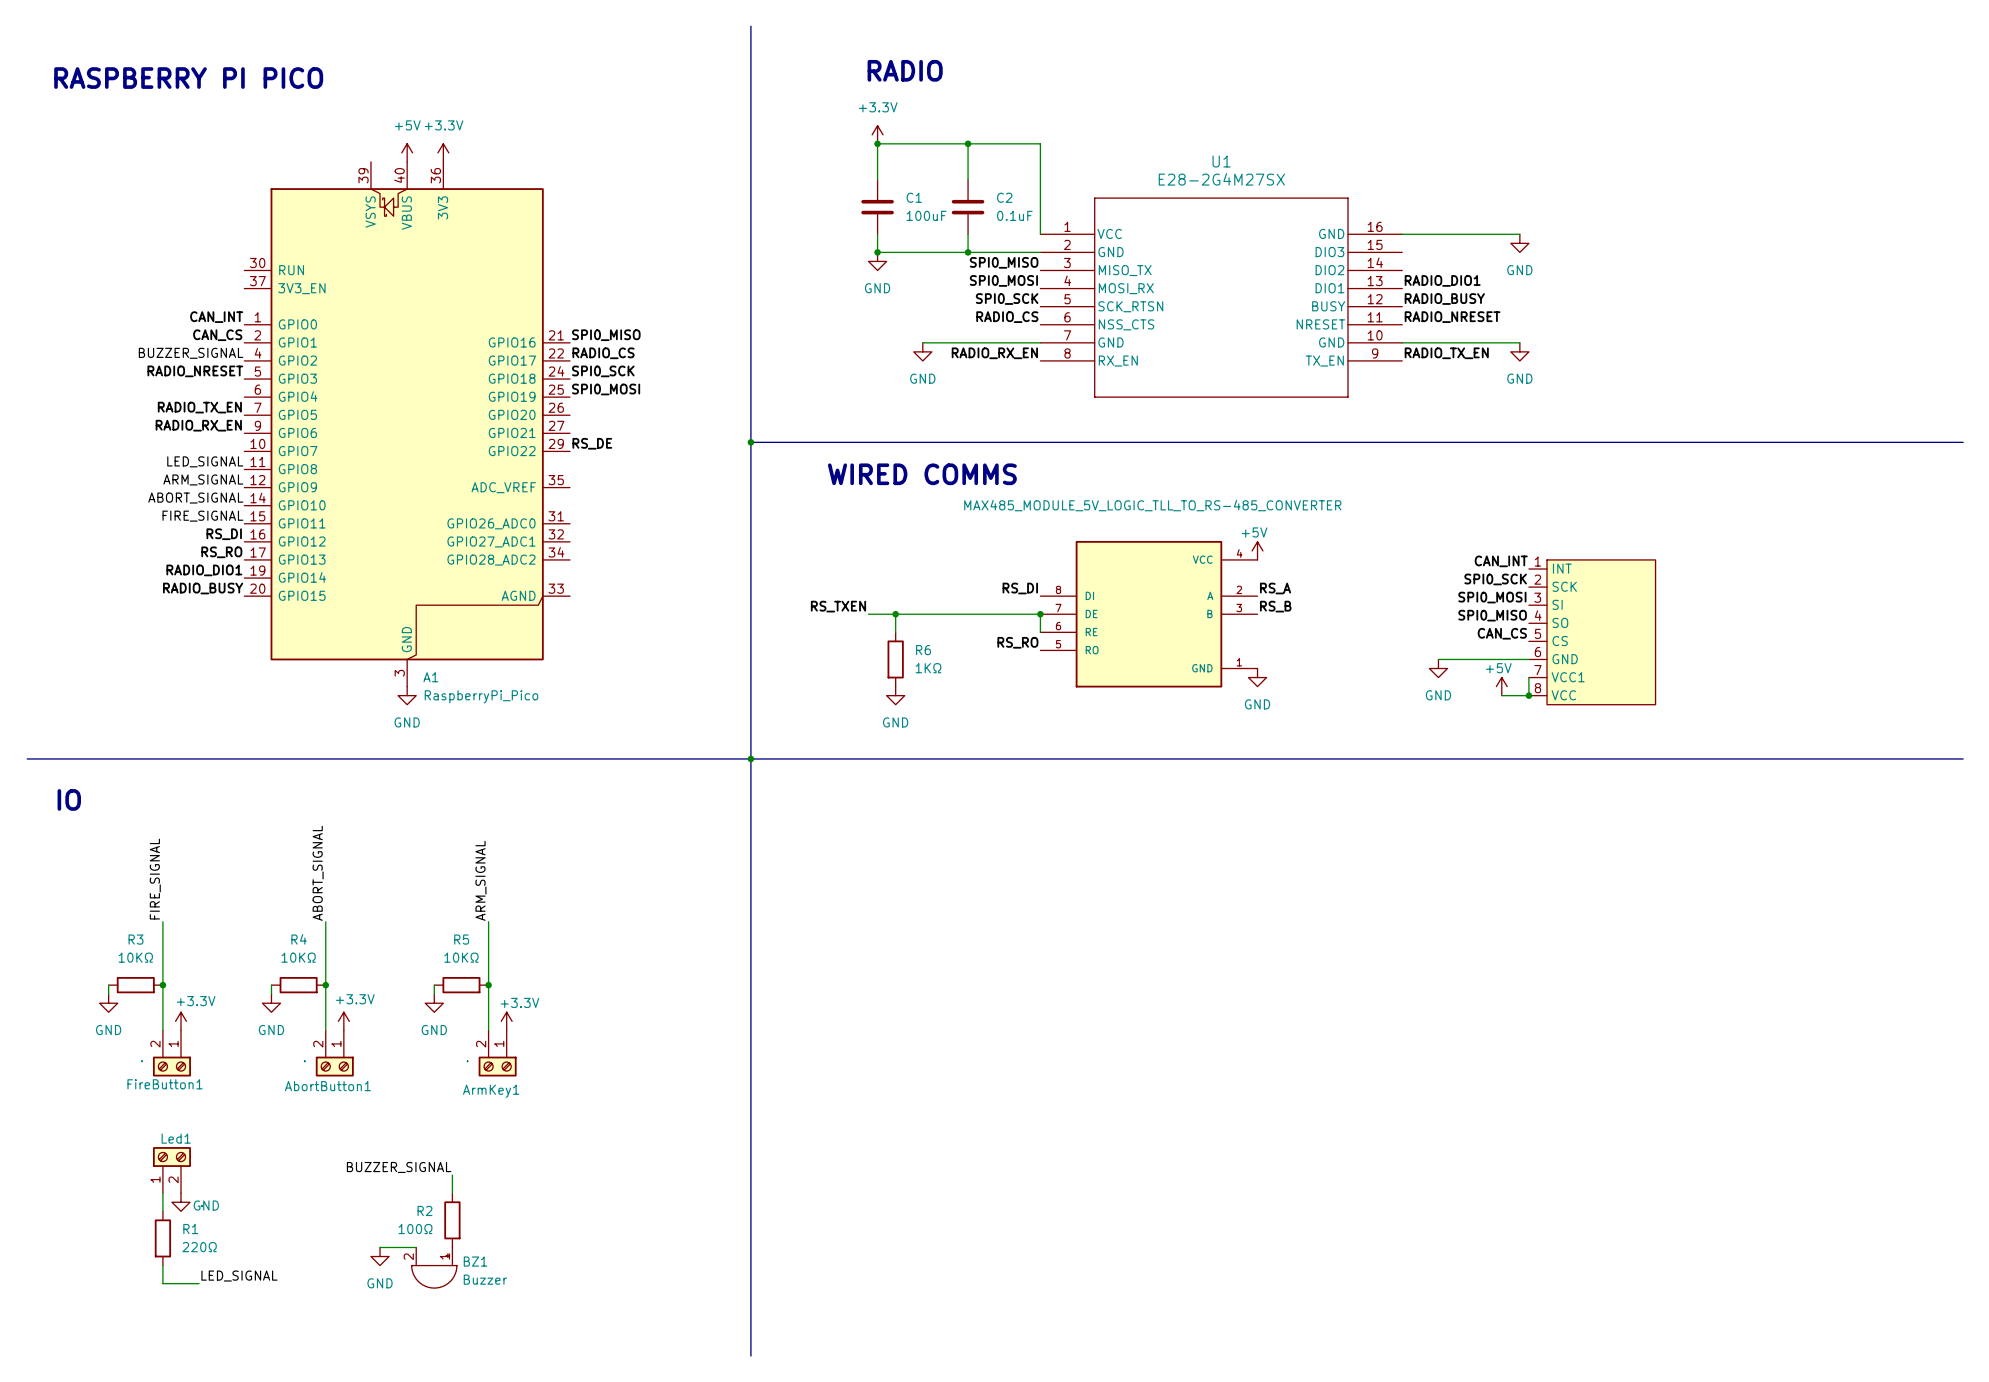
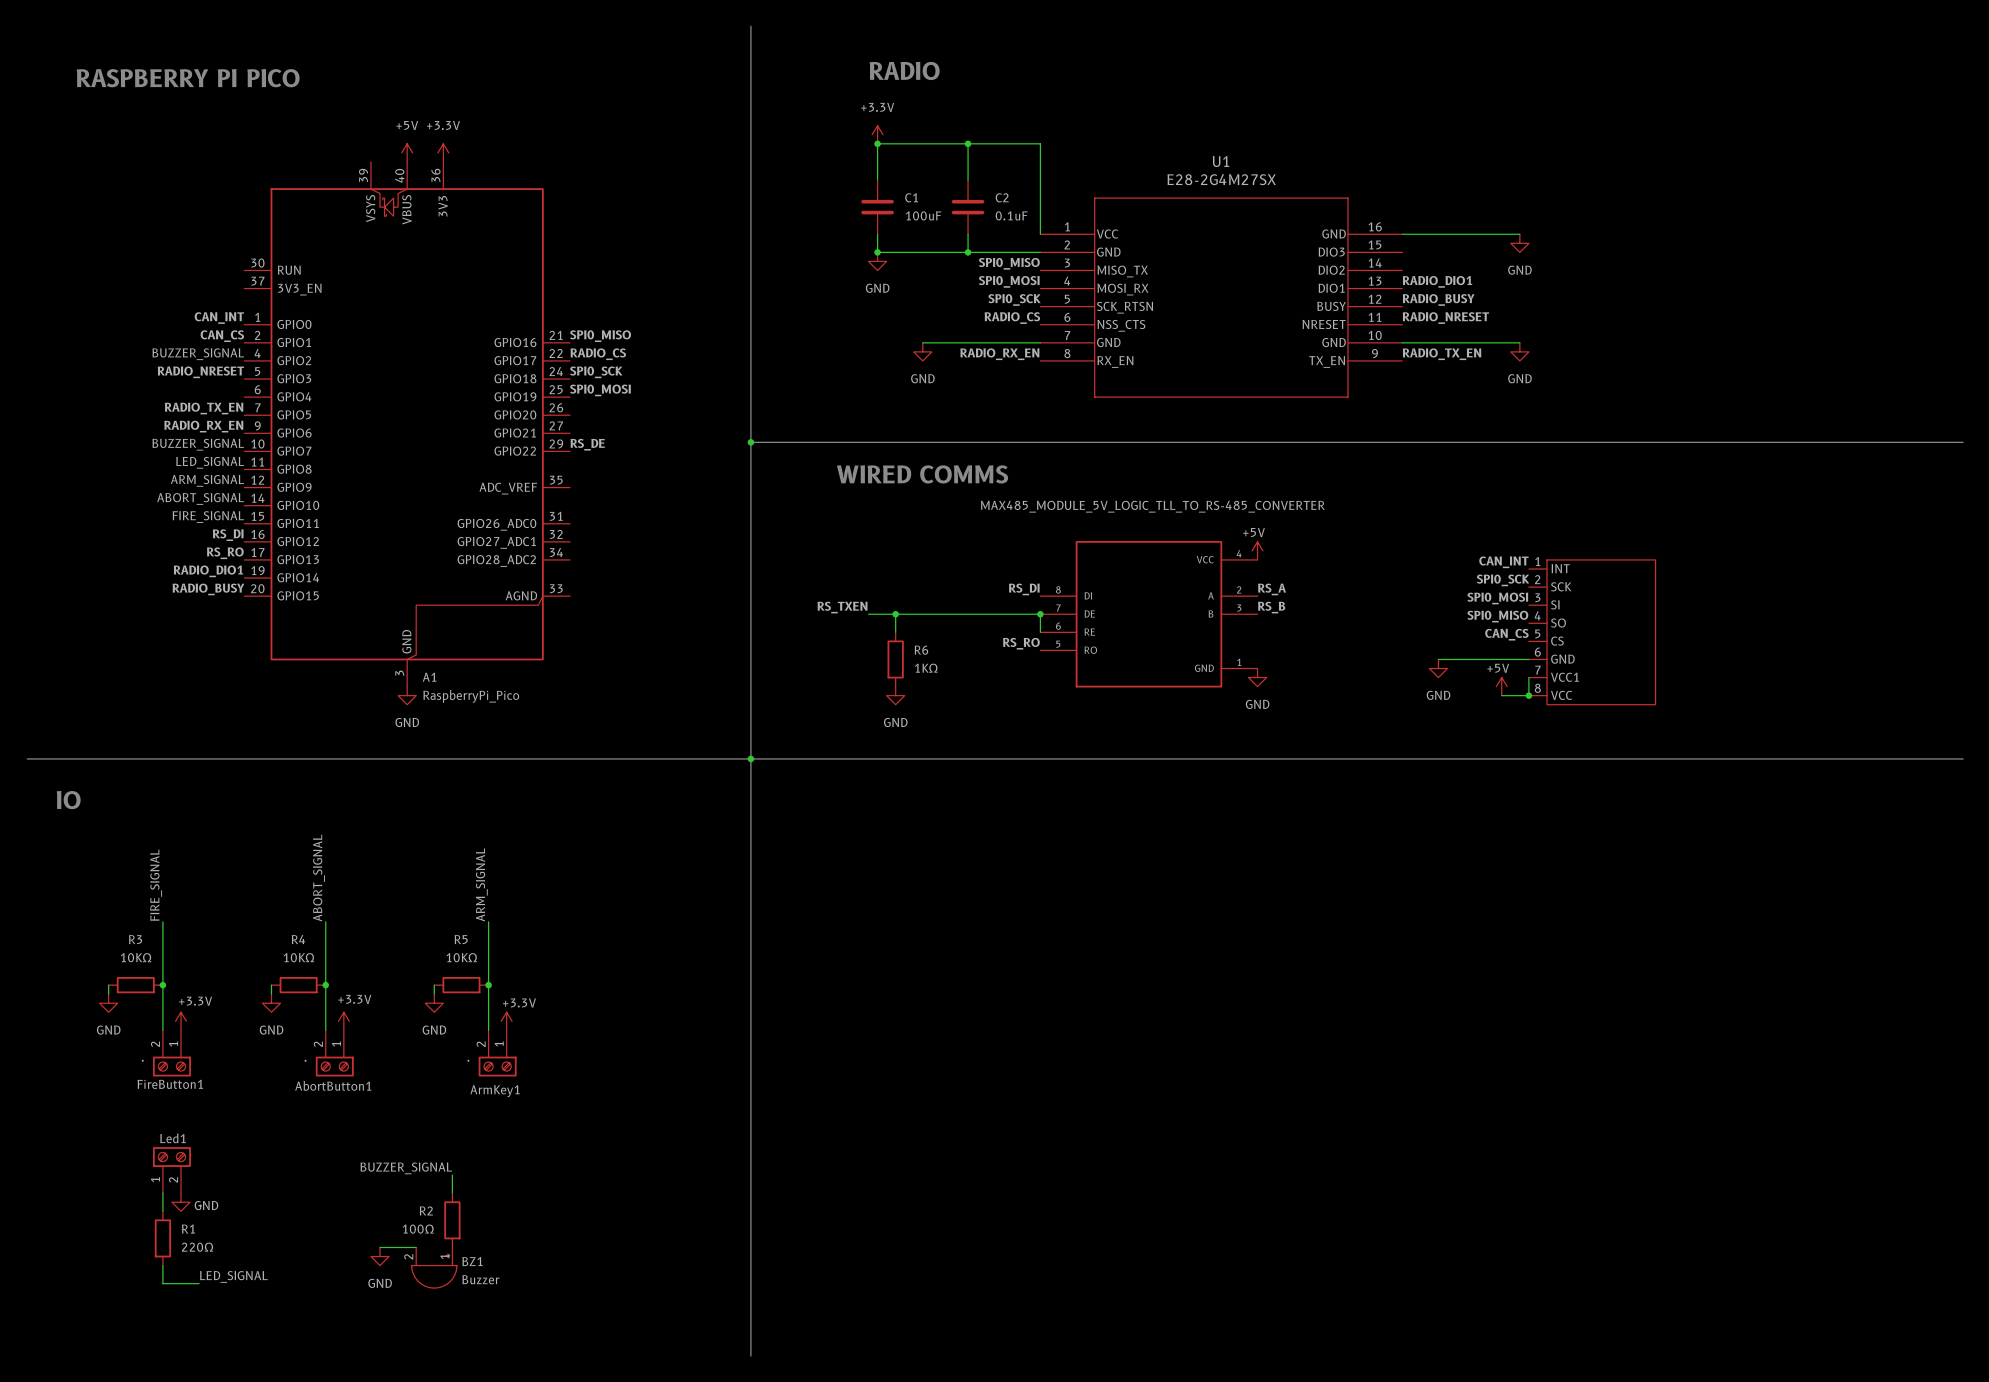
label: none -> BUZZER_SIGNAL (198, 444)

